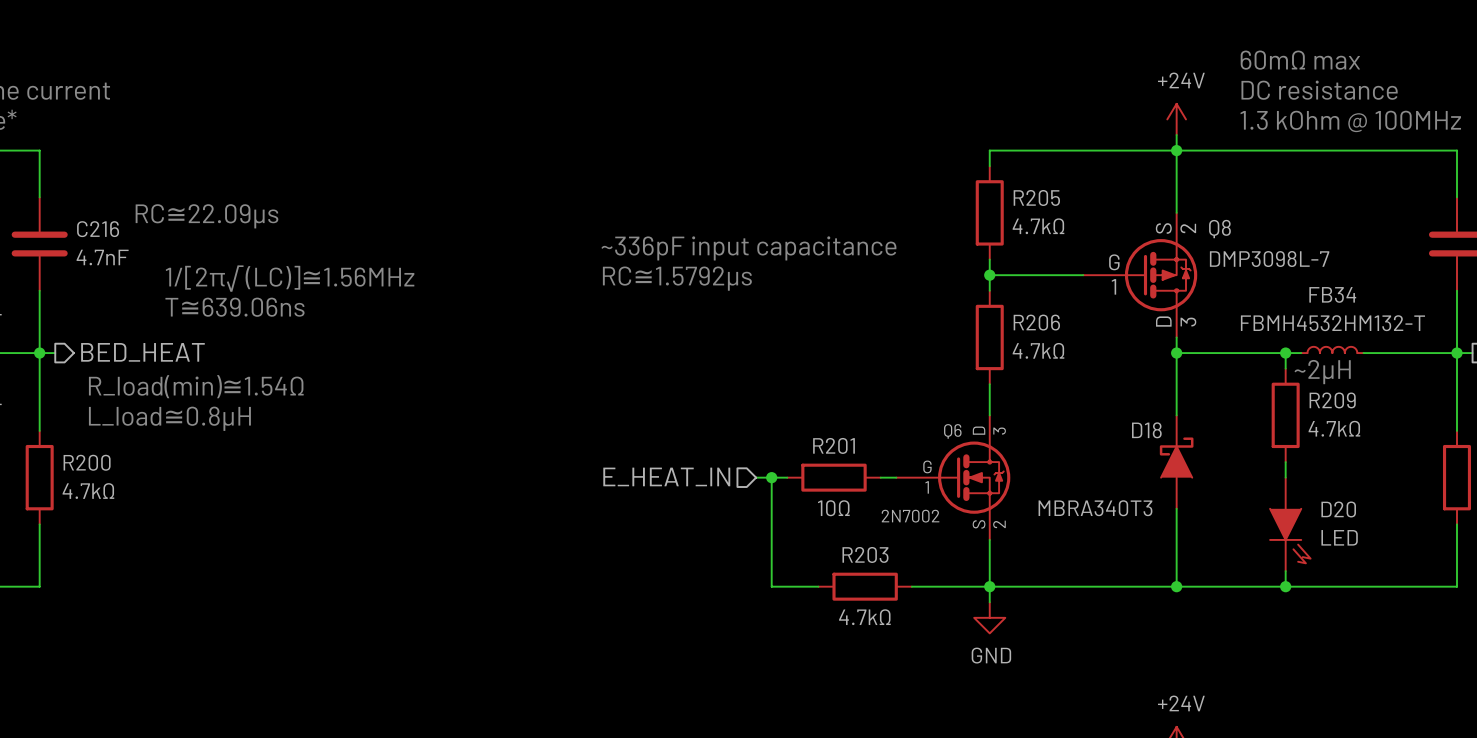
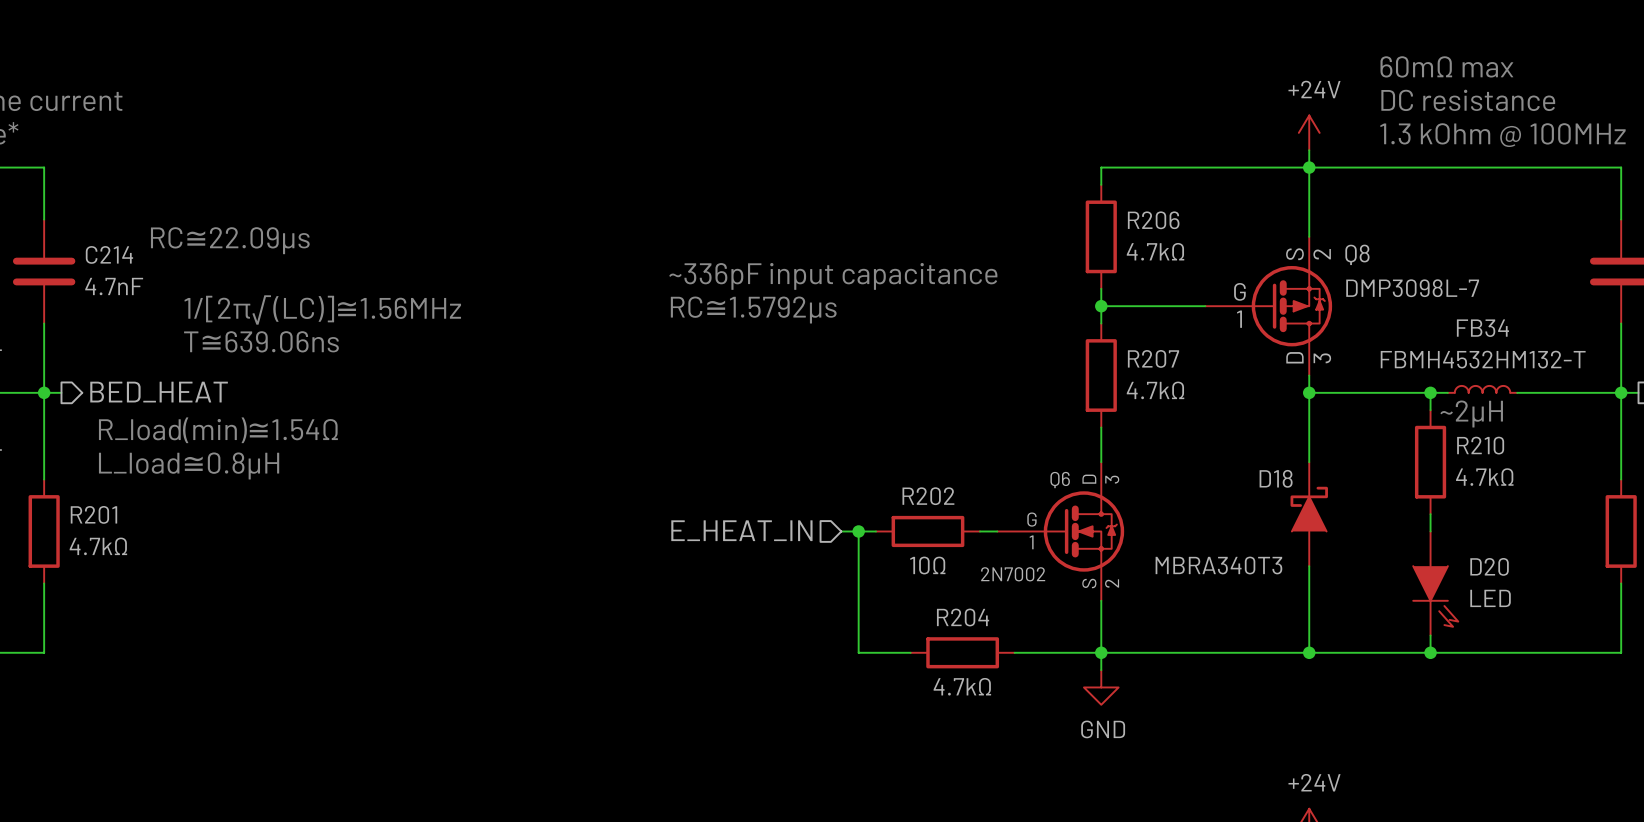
R205 name: R205 (1036, 197) -> R206 (1153, 220)
C216 name: C216 (98, 229) -> C214 (109, 254)
R206 name: R206 (1036, 322) -> R207 (1153, 358)
R209 name: R209 (1332, 400) -> R210 (1480, 445)
R201 name: R201 (834, 445) -> R202 (928, 496)
R200 name: R200 (87, 462) -> R201 (93, 514)
R203 name: R203 (865, 554) -> R204 (963, 617)

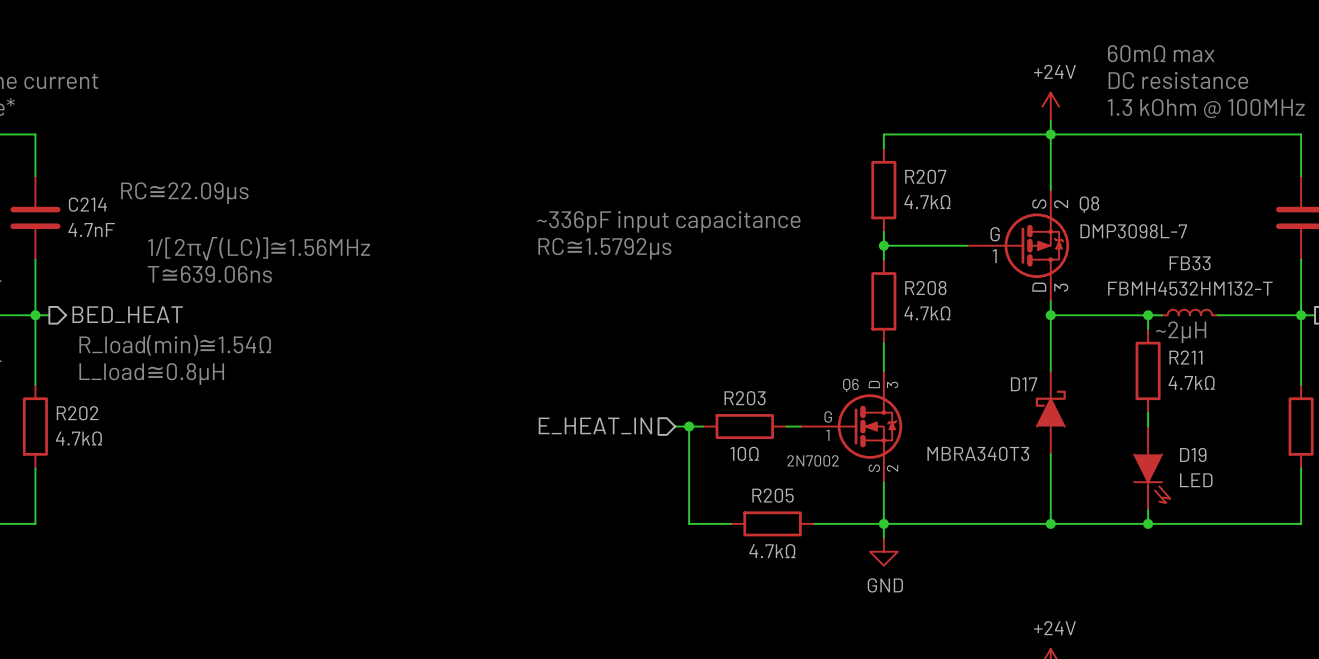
R206 name: R206 (1153, 220) -> R207 (925, 176)
FB34 name: FB34 (1482, 328) -> FB33 (1190, 263)
R207 name: R207 (1153, 358) -> R208 (925, 288)
R210 name: R210 (1480, 445) -> R211 (1185, 357)
D18 name: D18 (1276, 478) -> D17 (1024, 384)
R202 name: R202 (928, 496) -> R203 (745, 398)
R201 name: R201 (93, 514) -> R202 (77, 413)
D20 name: D20 (1489, 566) -> D19 (1193, 454)
R204 name: R204 (963, 617) -> R205 (773, 495)

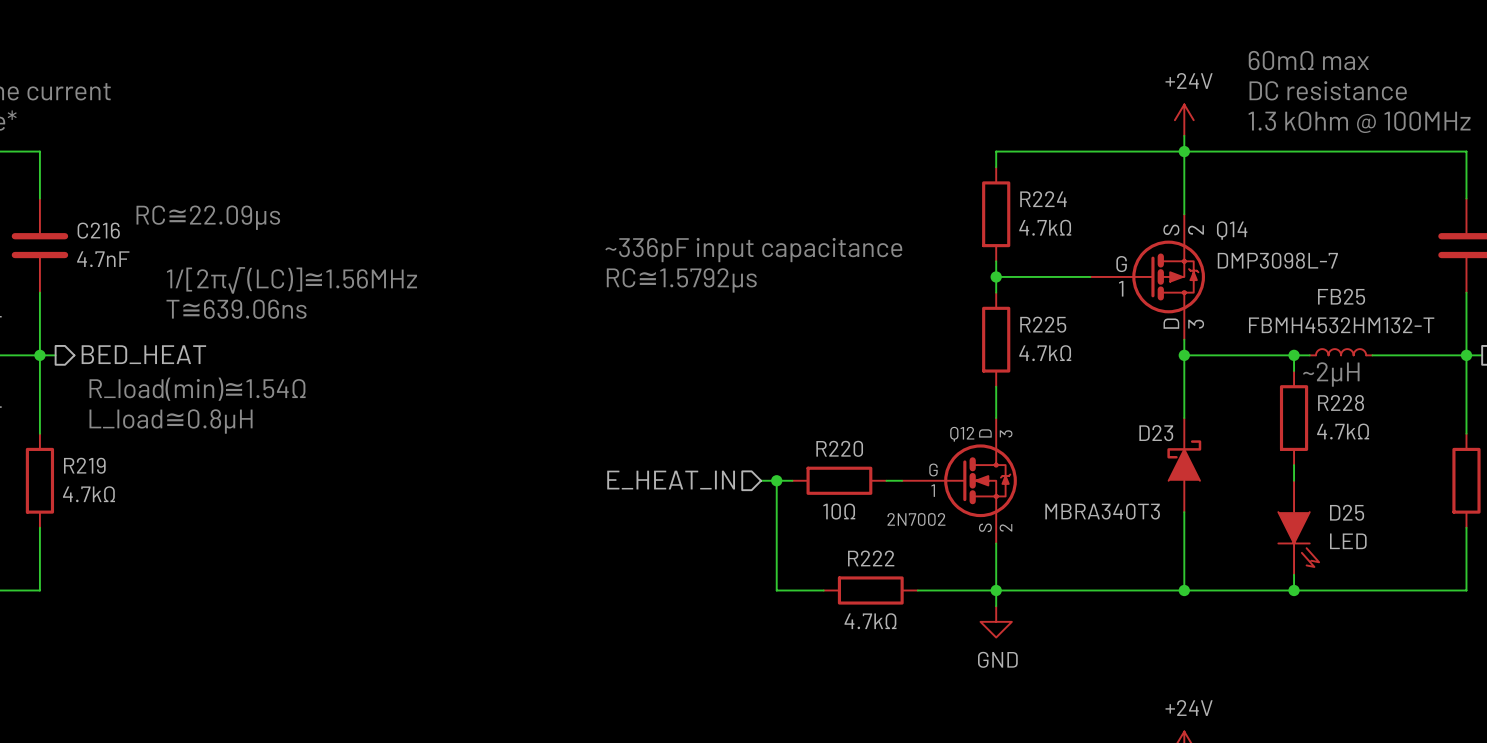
R207 name: R207 (925, 176) -> R224 (1043, 199)
C214 name: C214 (87, 204) -> C216 (98, 230)
Q8 name: Q8 (1089, 204) -> Q14 (1232, 230)
FB33 name: FB33 (1190, 263) -> FB25 (1341, 296)
R208 name: R208 (925, 288) -> R225 (1043, 324)
R211 name: R211 (1185, 357) -> R228 (1341, 403)
D17 name: D17 (1024, 384) -> D23 (1156, 433)
Q6 name: Q6 (850, 385) -> Q12 (962, 434)
R203 name: R203 (745, 398) -> R220 (839, 448)
R202 name: R202 (77, 413) -> R219 (84, 465)
D19 name: D19 (1193, 454) -> D25 (1347, 512)
R205 name: R205 (773, 495) -> R222 (871, 558)

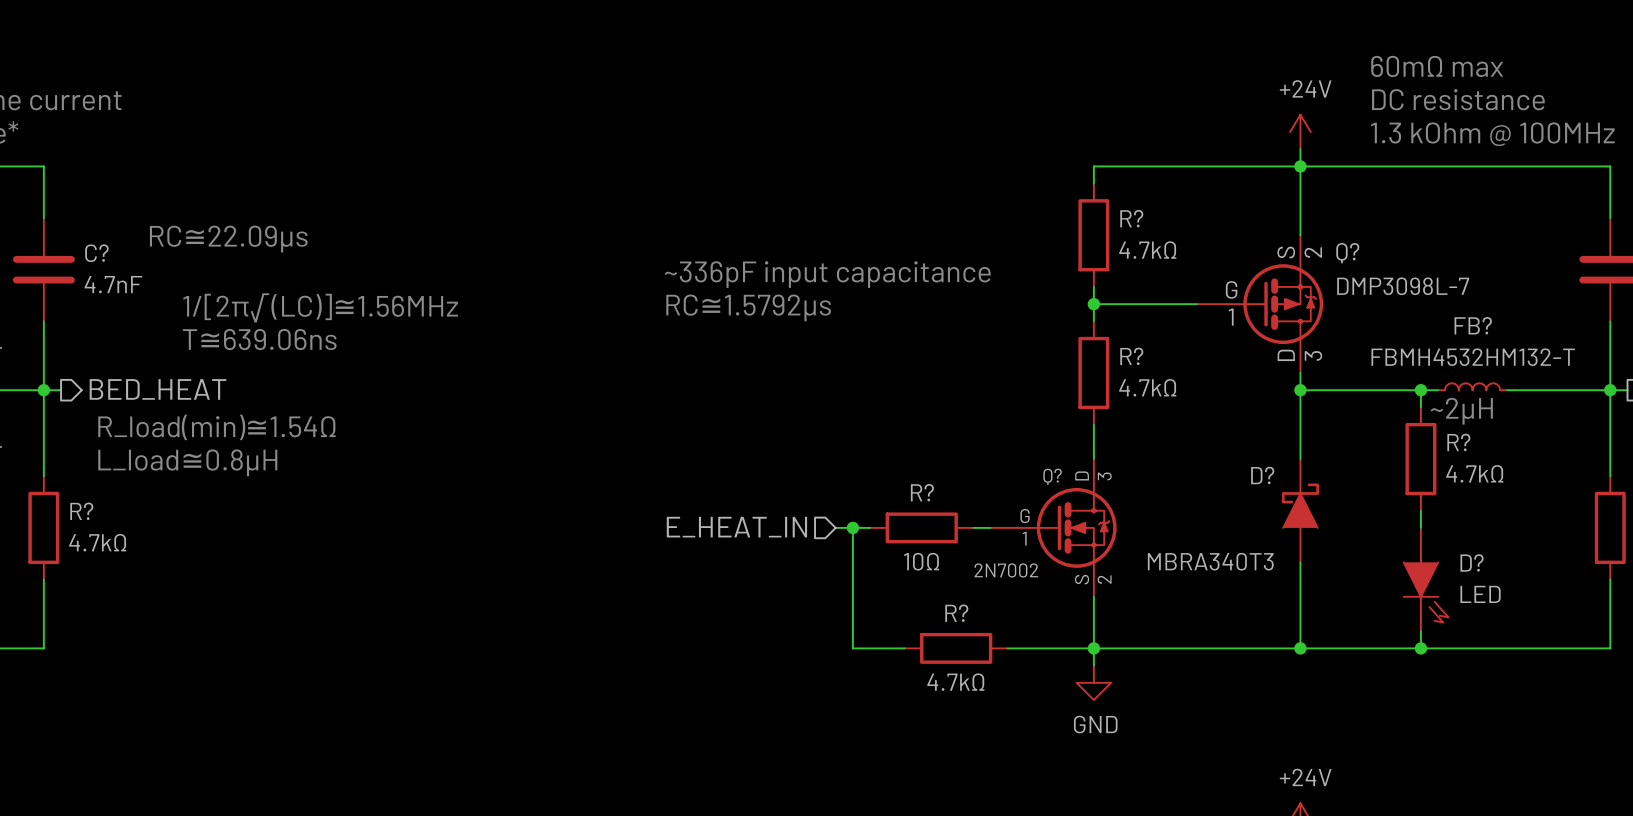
R224 name: R224 (1043, 199) -> R? (1131, 218)
C216 name: C216 (98, 230) -> C? (96, 253)
Q14 name: Q14 (1232, 230) -> Q? (1347, 253)
FB25 name: FB25 (1341, 296) -> FB? (1473, 325)
R225 name: R225 (1043, 324) -> R? (1131, 356)
R228 name: R228 (1341, 403) -> R? (1458, 442)
D23 name: D23 (1156, 433) -> D? (1262, 475)
Q12 name: Q12 (962, 434) -> Q? (1052, 476)
R220 name: R220 (839, 448) -> R? (922, 492)
R219 name: R219 (84, 465) -> R? (81, 511)
D25 name: D25 (1347, 512) -> D? (1472, 562)
R222 name: R222 (871, 558) -> R? (956, 613)

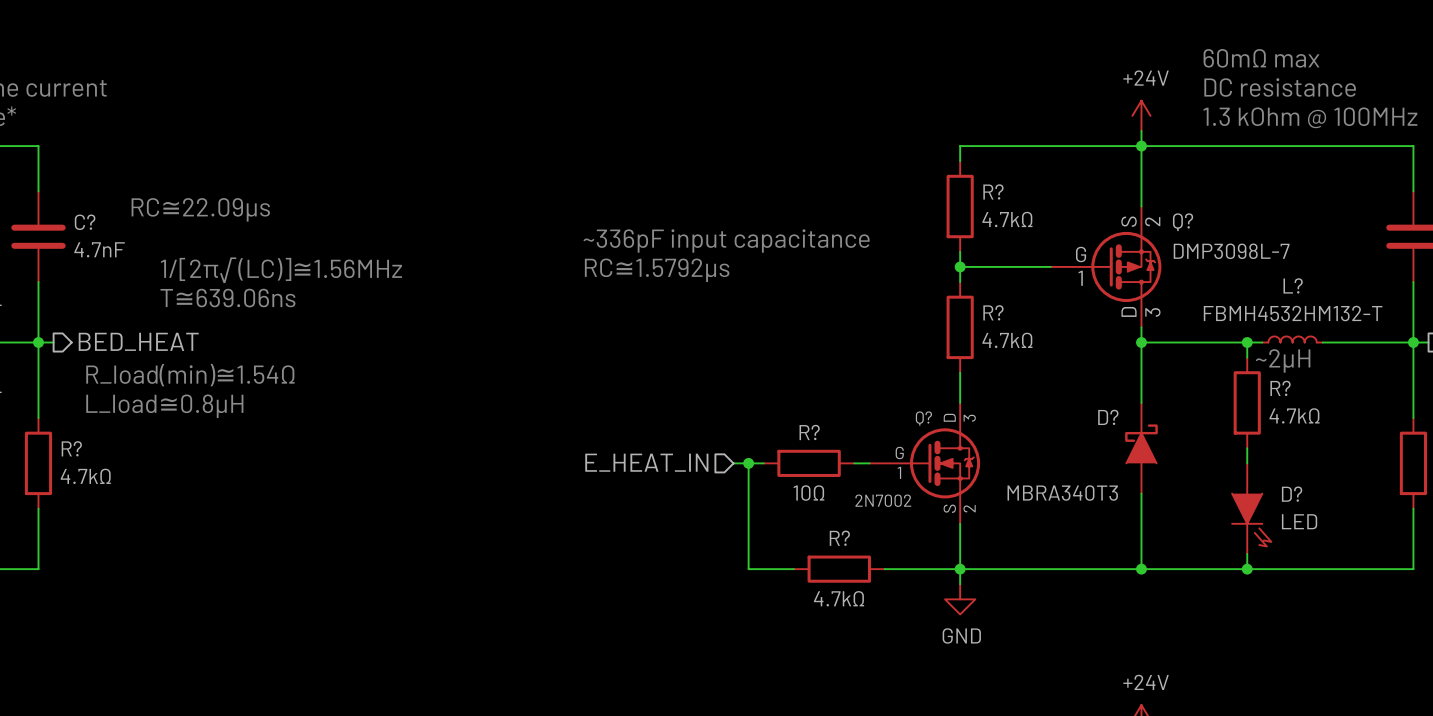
FB? name: FB? (1473, 325) -> L? (1293, 285)

